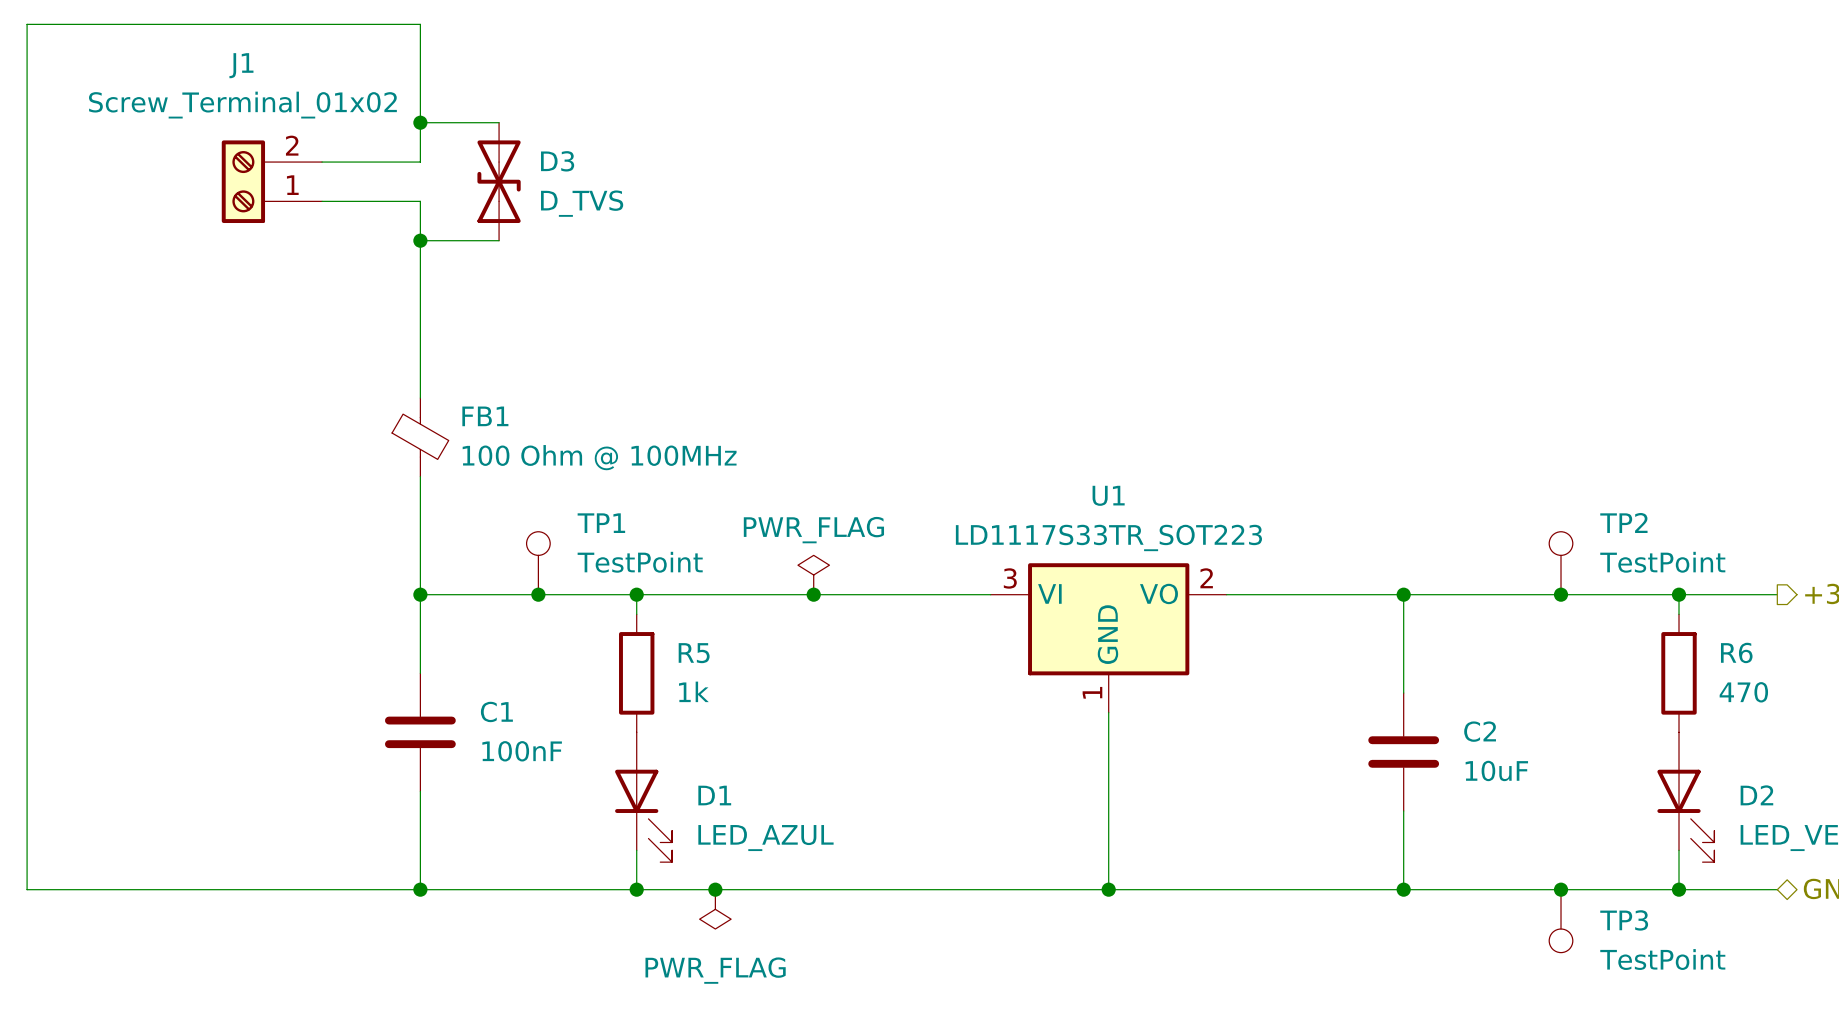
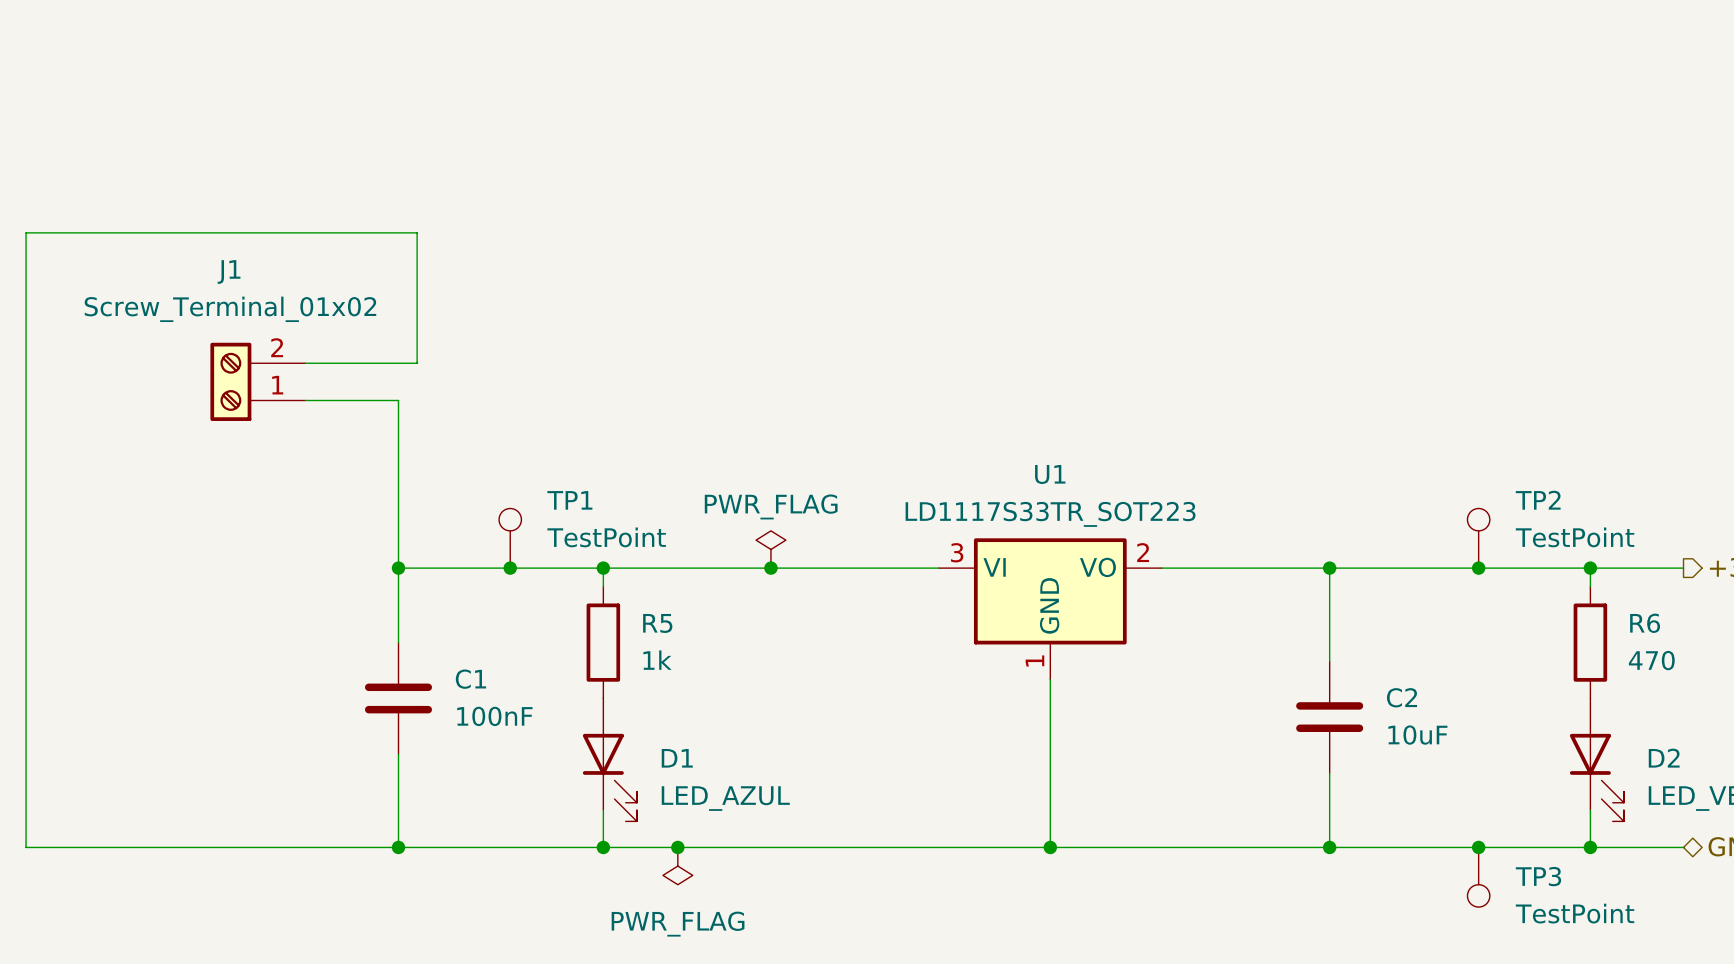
wire: (420, 122) (499, 122) -> none
junction: (420, 122) -> none
wire: (322, 162) (420, 162) (420, 24) (27, 24) (27, 240) -> (398, 232) (26, 232)
J1 position: (271, 181) -> (257, 381)
D3: D_TVS (499, 181) -> none
wire: (322, 201) (420, 201) (420, 398) -> none
junction: (420, 240) -> none
wire: (440, 240) (499, 240) -> (417, 232) (417, 363) (305, 363)
wire: none -> (305, 400) (398, 400) (398, 456)
FB1: 100 Ohm @ 100MHz (420, 437) -> none

